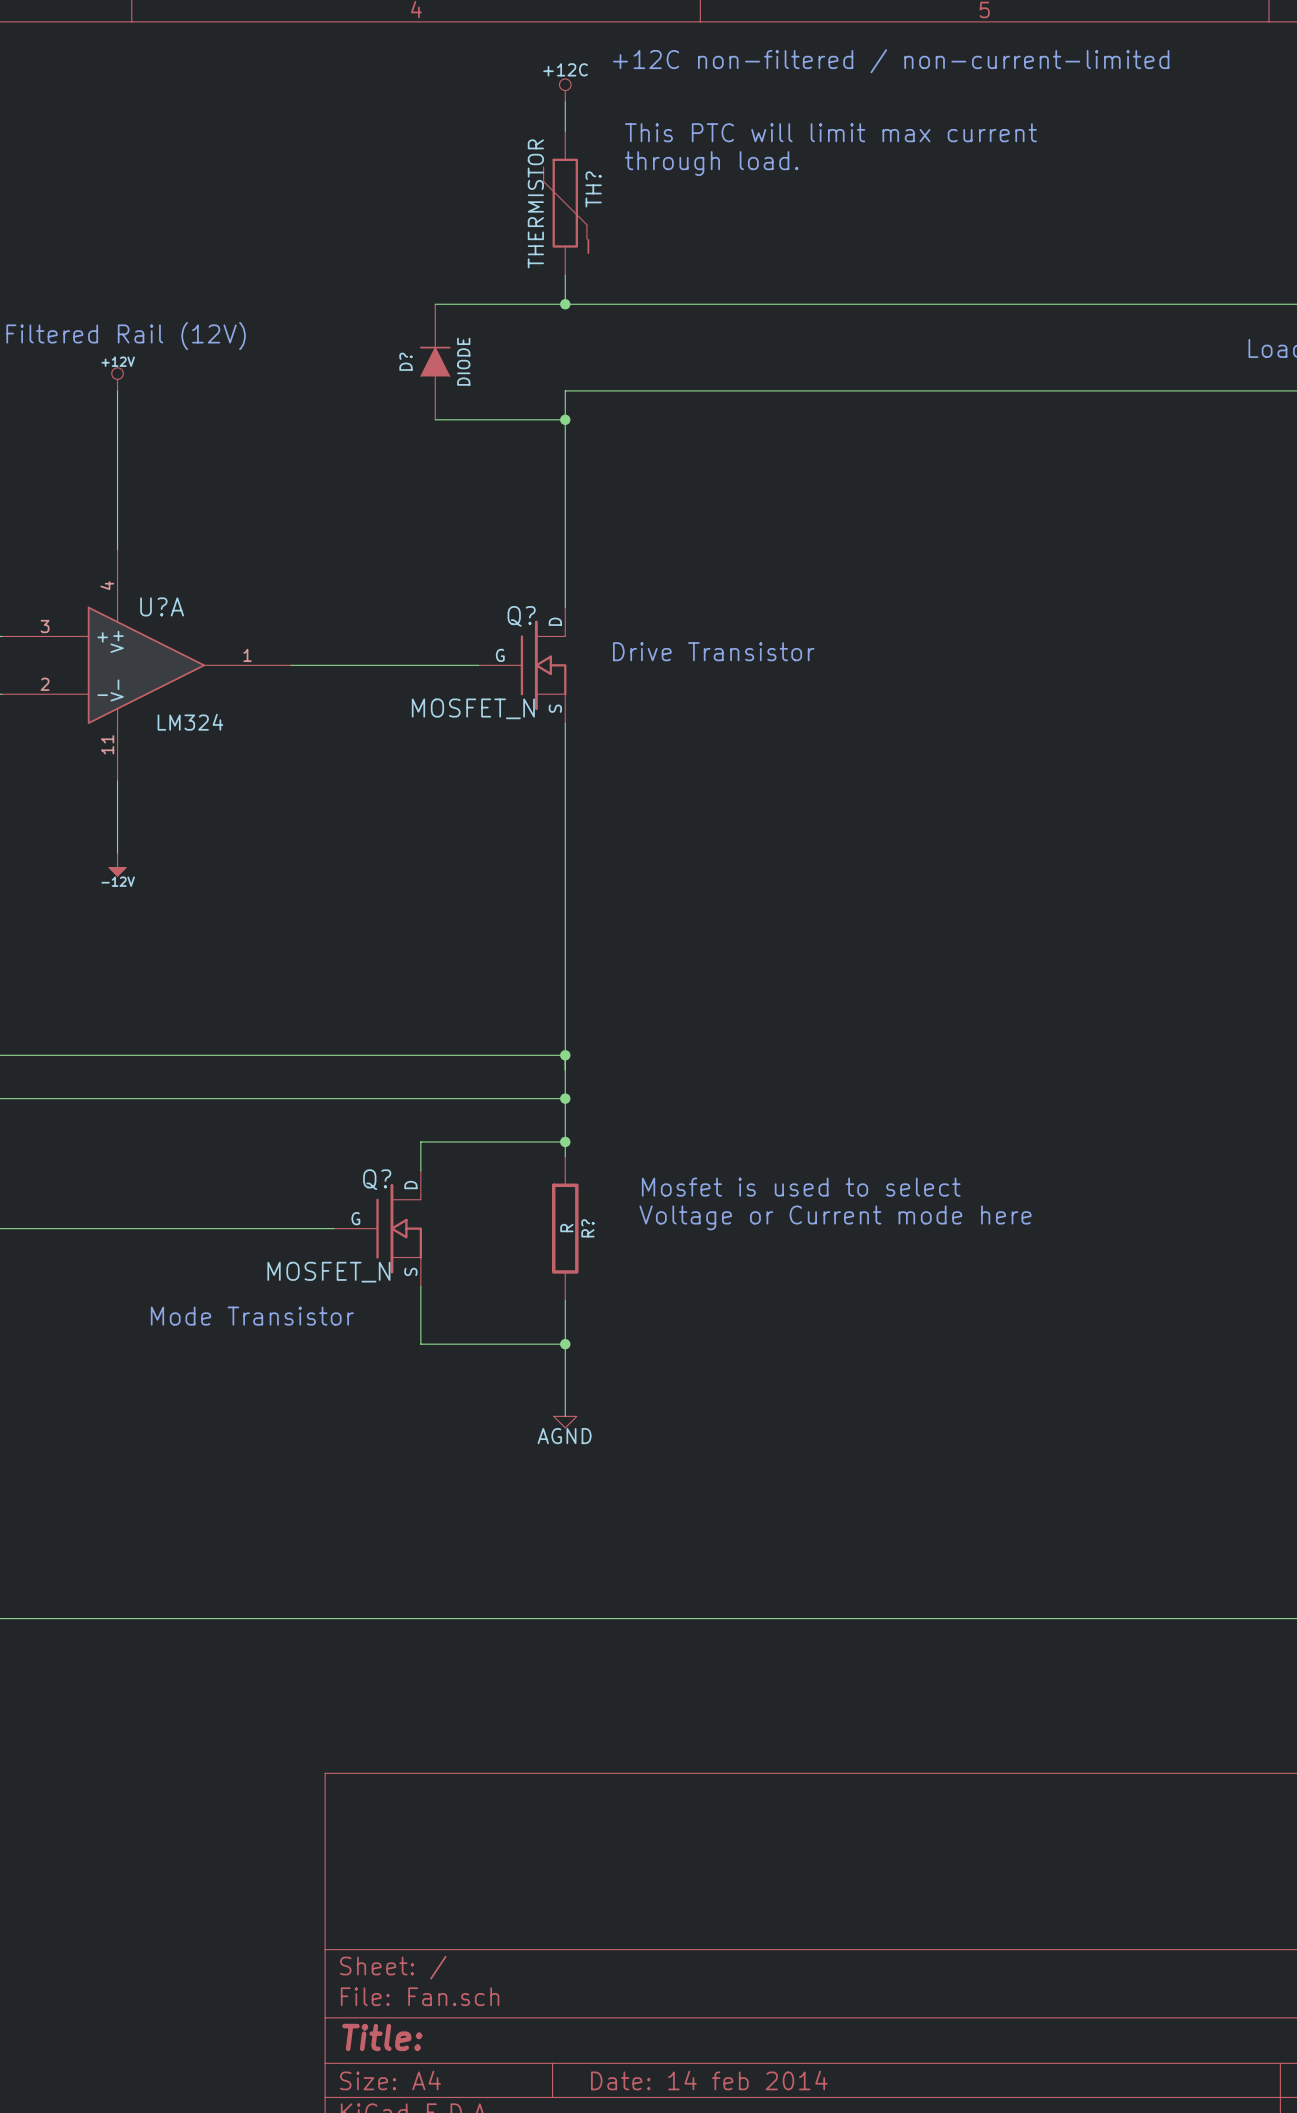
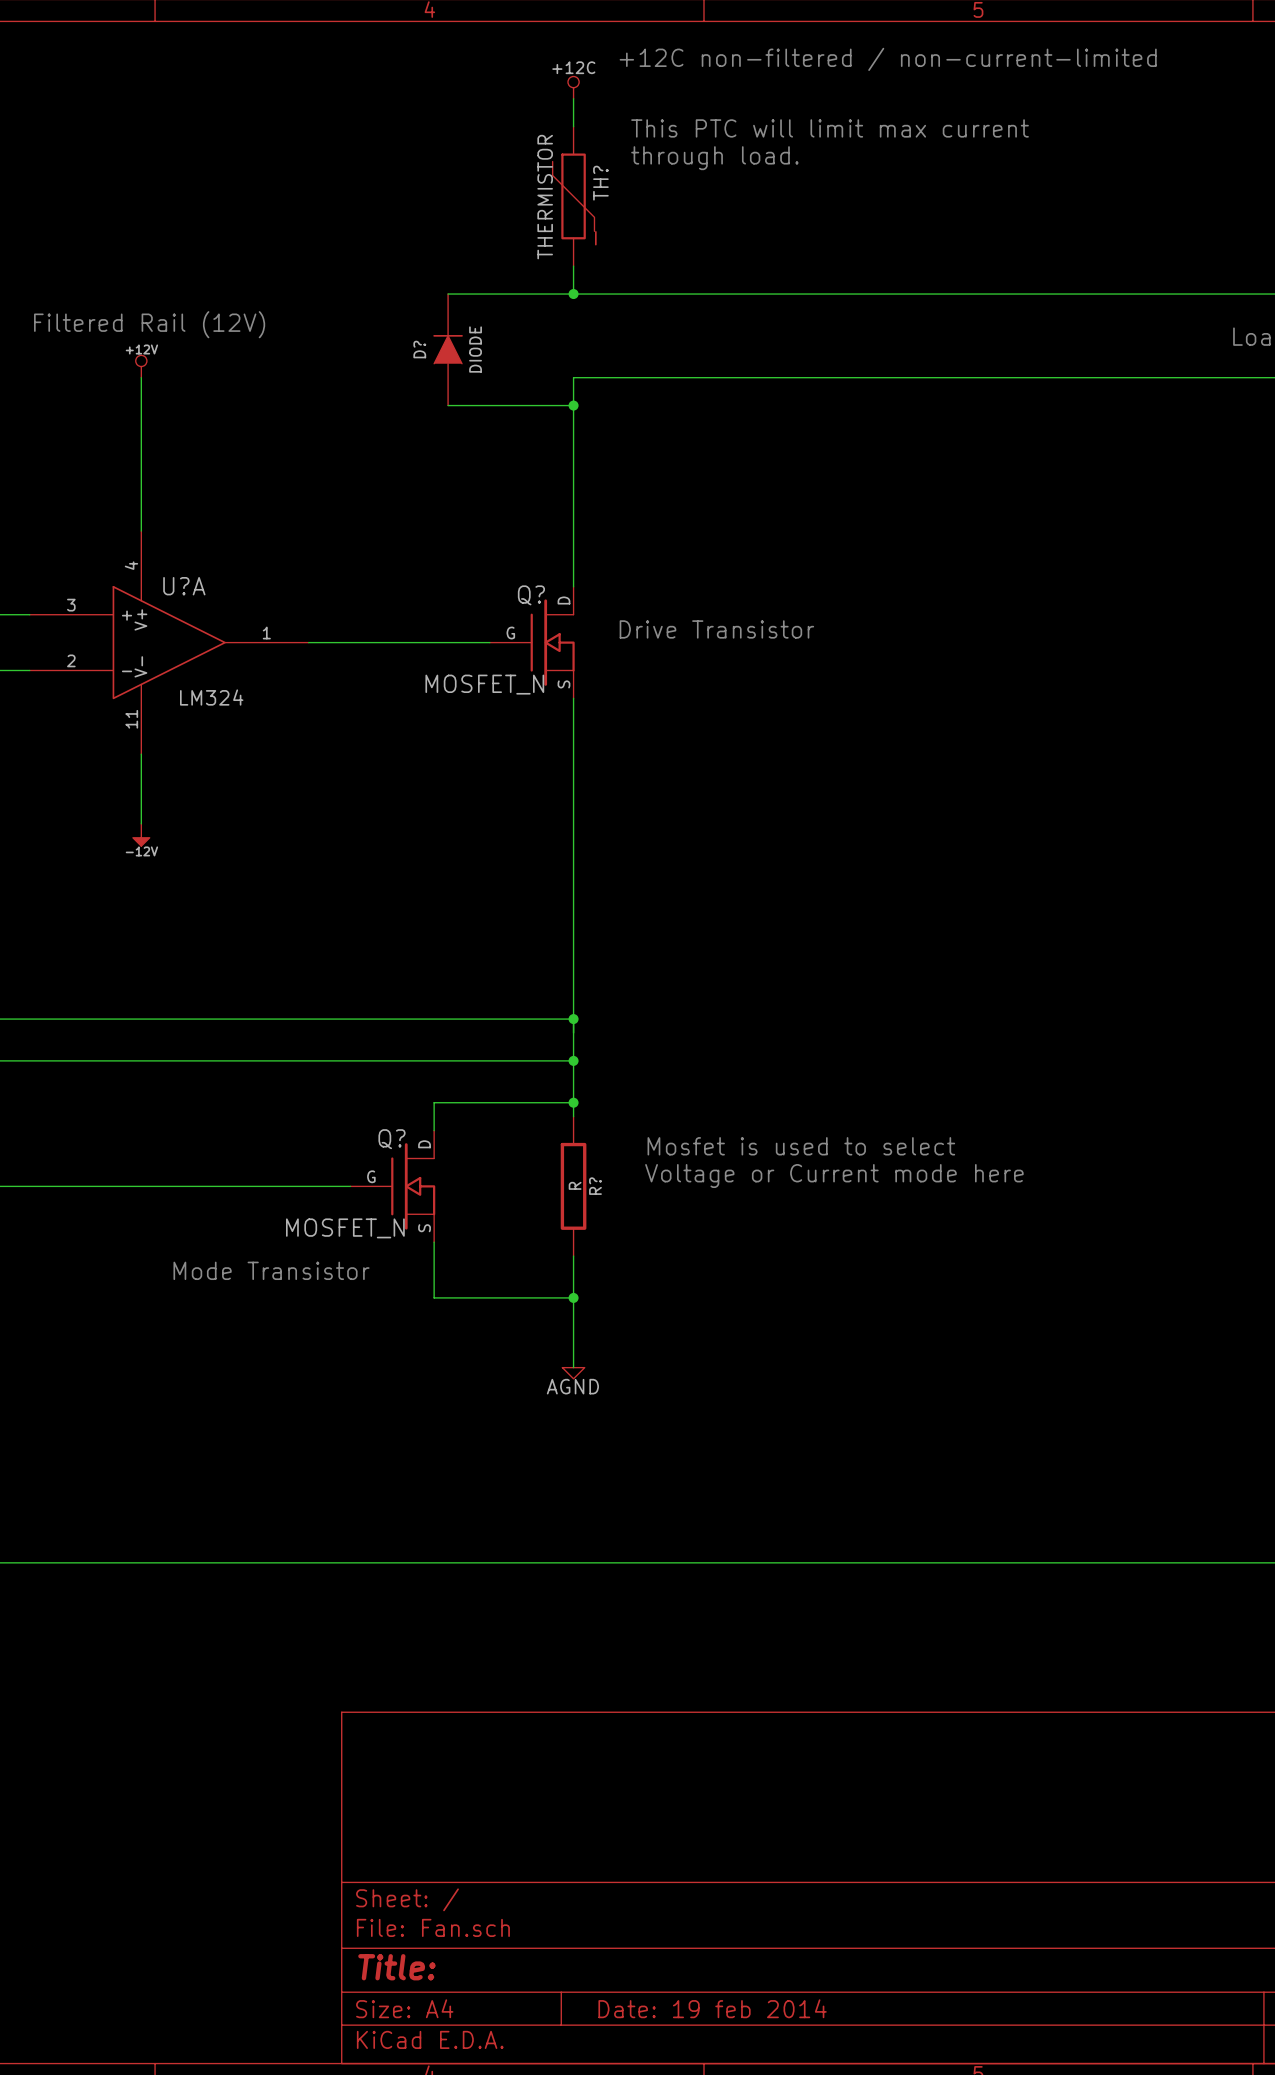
title block: Date: 14 feb 2014 (709, 2080) -> Date: 19 feb 2014 (712, 2008)

